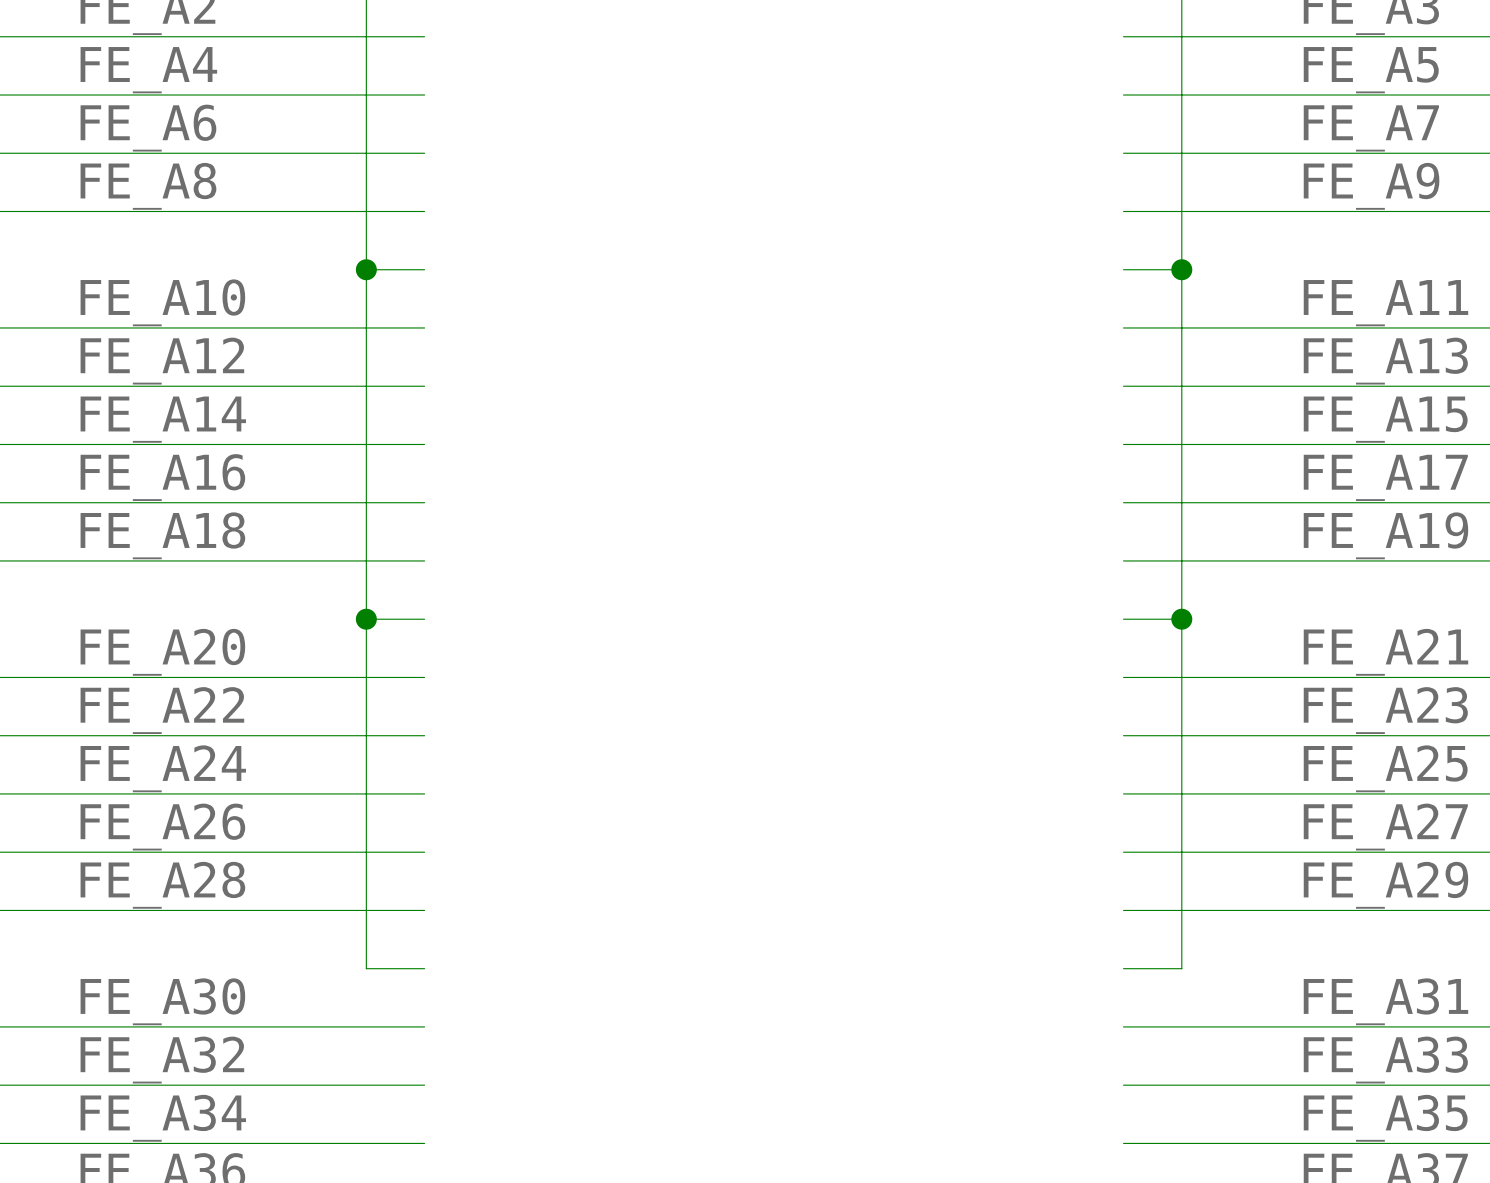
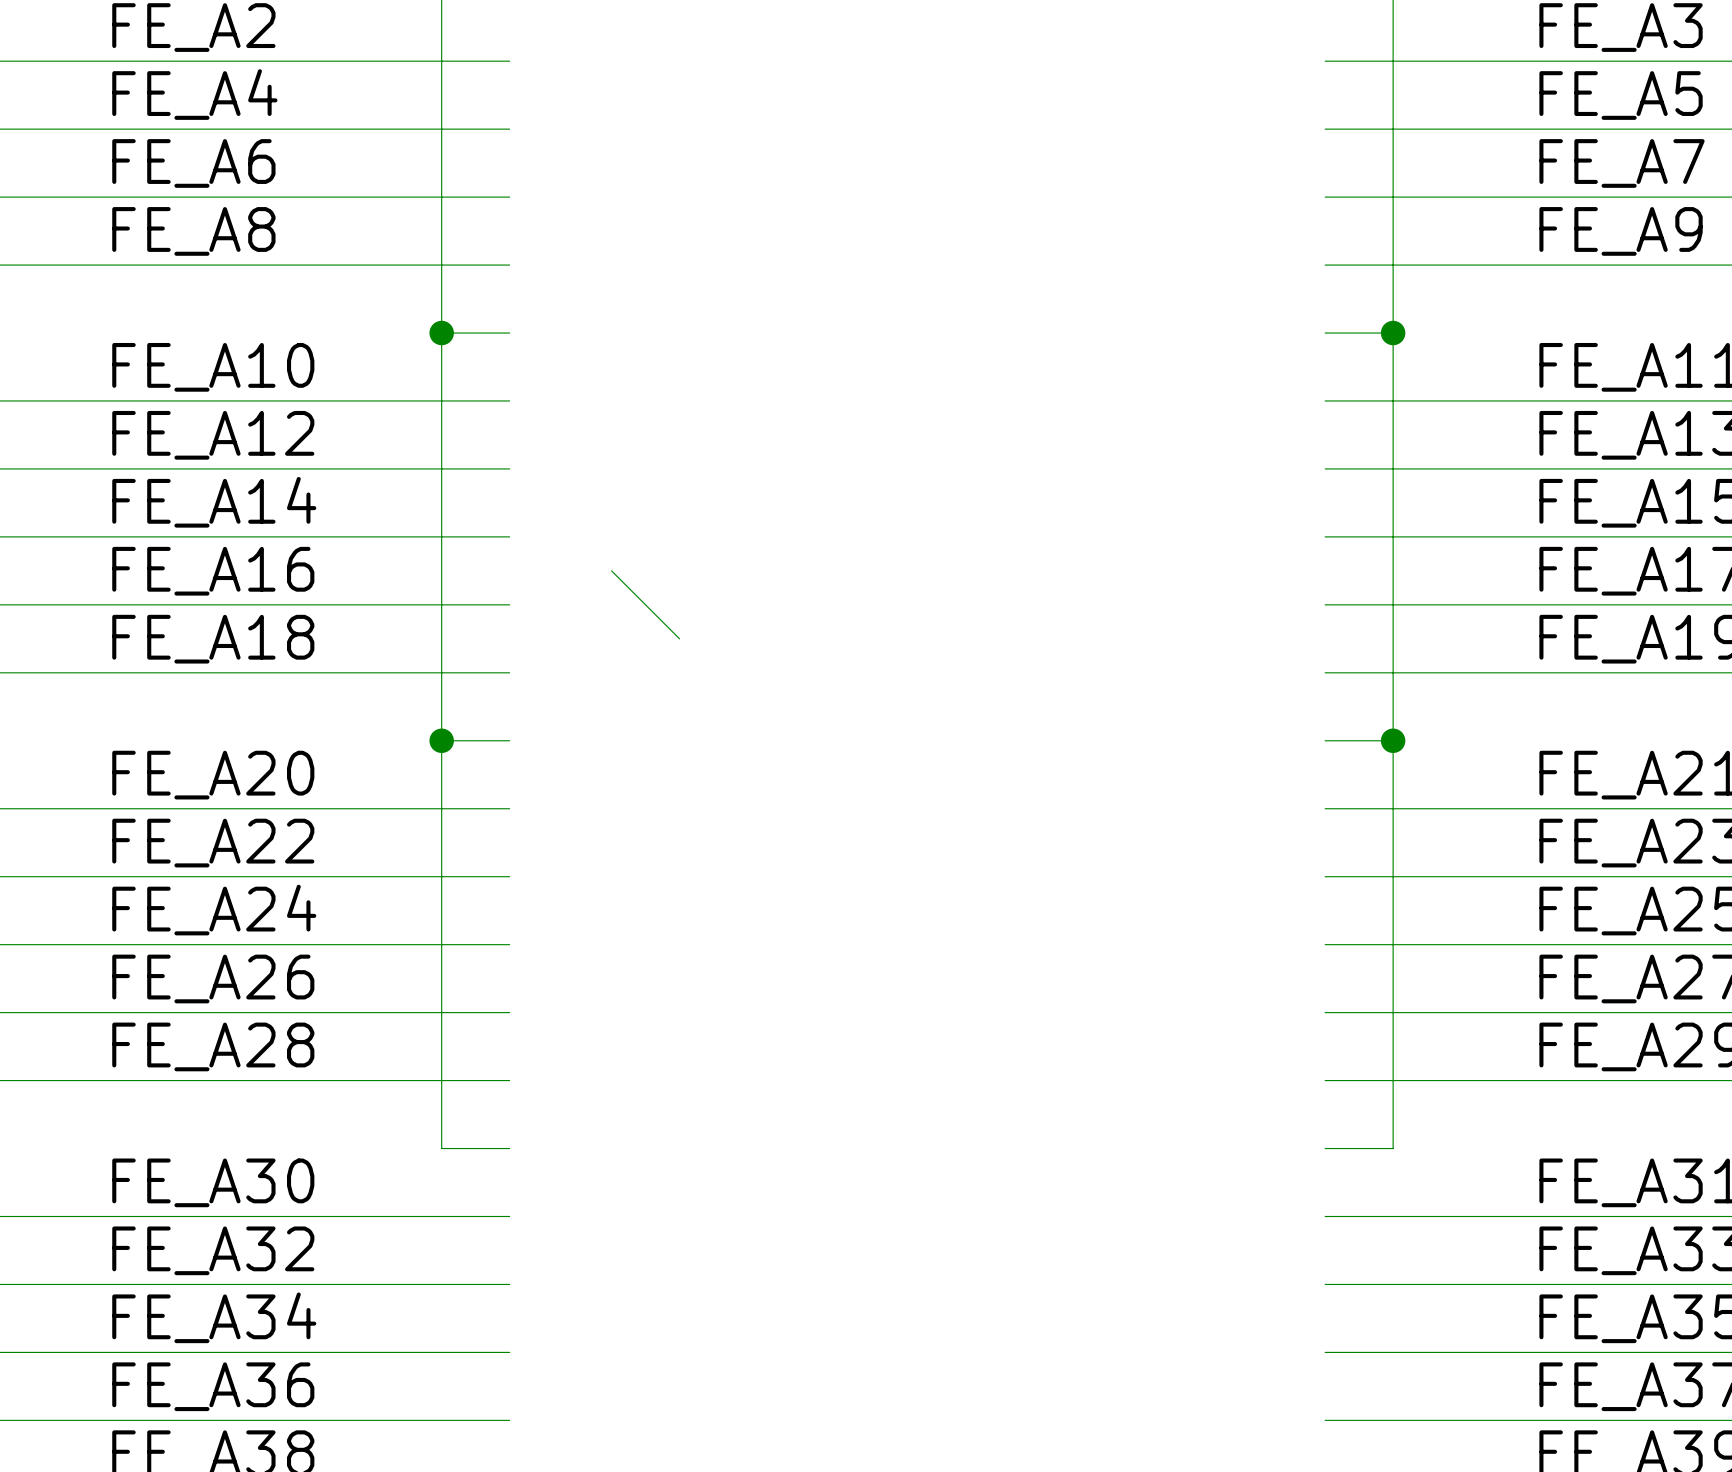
wire: none -> (611, 570) (679, 638)

